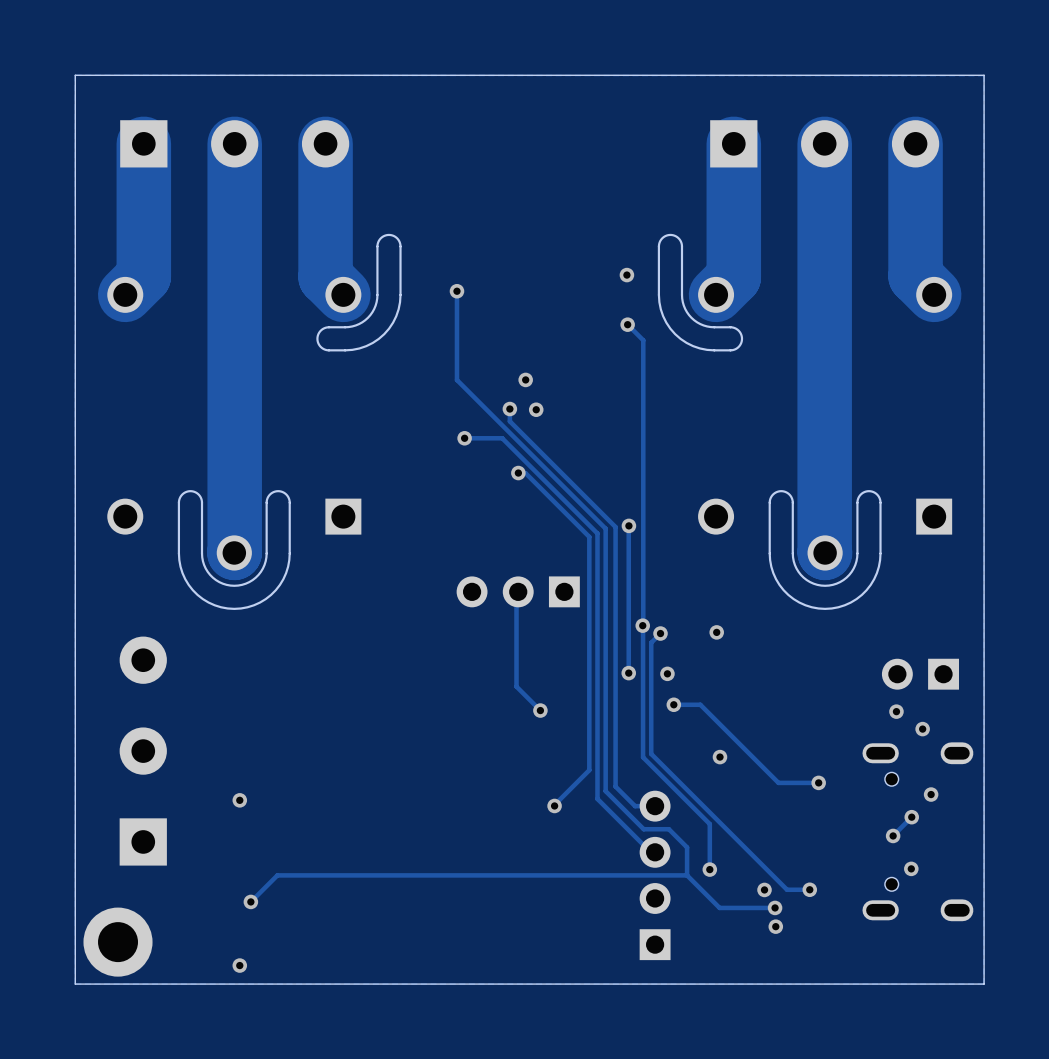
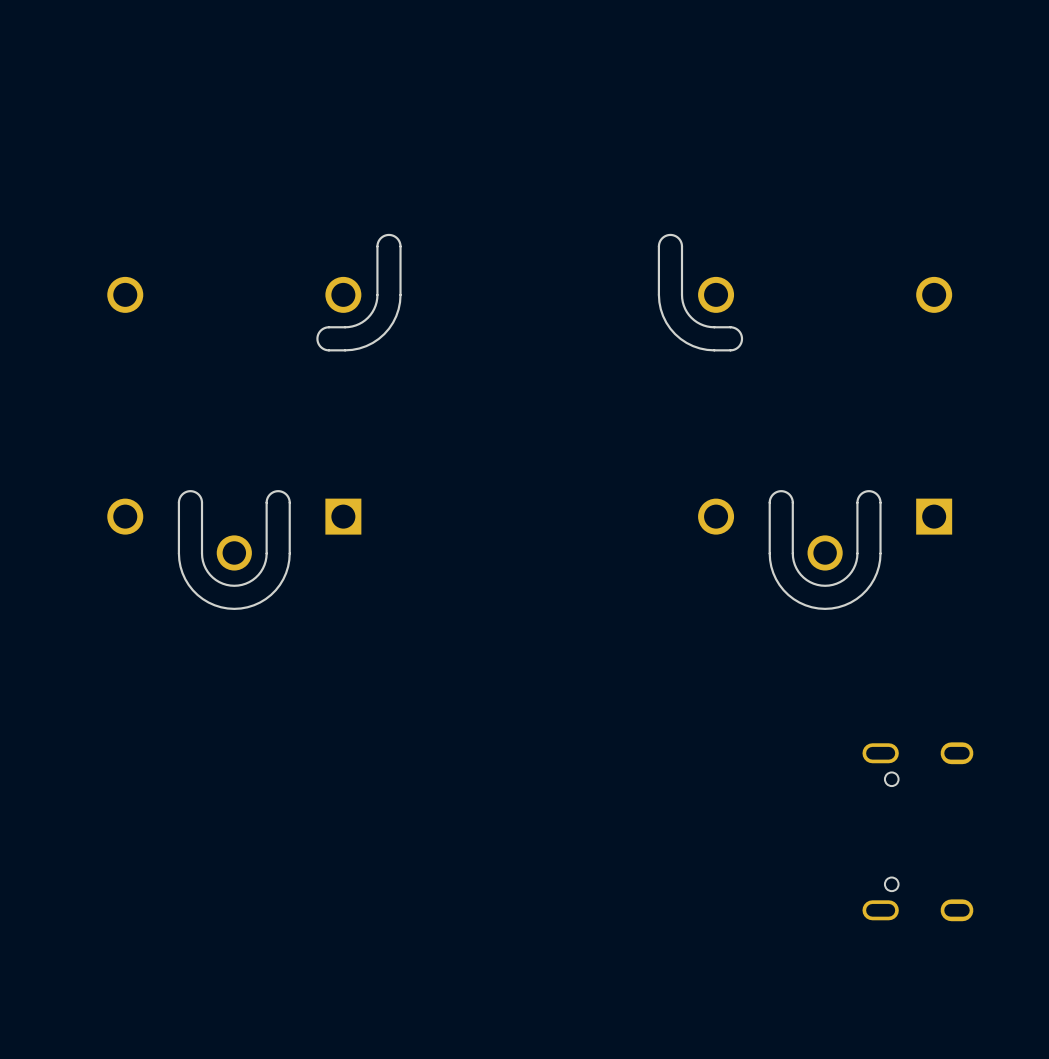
board edge: (984, 75) (984, 984) (75, 984) (75, 75) (984, 75) -> none
track: (143, 143) (143, 276) (125, 294) -> none
track: (234, 143) (234, 552) -> none
part: (234, 143) -> none
track: (325, 143) (325, 277) (343, 294) -> none
track: (733, 143) (733, 277) (716, 294) -> none
track: (824, 143) (825, 552) -> none
part: (824, 143) -> none
track: (915, 143) (915, 276) (934, 294) -> none
via: (626, 275) -> none
track: (456, 291) (456, 380) (605, 528) (605, 791) (643, 829) (668, 829) (687, 847) (687, 875) -> none
via: (456, 291) -> none
track: (627, 324) (643, 340) (643, 757) (709, 824) (709, 869) -> none
via: (627, 324) -> none
via: (525, 379) -> none
track: (509, 409) (509, 421) (615, 527) (615, 786) (635, 806) (655, 806) -> none
via: (509, 409) -> none
via: (536, 409) -> none
track: (464, 438) (502, 438) (597, 533) (597, 798) (652, 853) -> none
via: (464, 438) -> none
track: (518, 473) (525, 473) (589, 536) (589, 770) (554, 805) -> none
via: (518, 473) -> none
via: (628, 525) -> none
track: (628, 526) (628, 673) -> none
track: (518, 591) (516, 593) (516, 686) (540, 710) -> none
part: (518, 591) -> none
via: (642, 625) -> none
via: (716, 632) -> none
track: (660, 633) (651, 642) (651, 753) (787, 889) (809, 889) -> none
via: (660, 633) -> none
via: (628, 673) -> none
via: (667, 673) -> none
part: (920, 674) -> none
track: (673, 704) (700, 704) (778, 782) (818, 782) -> none
via: (673, 704) -> none
via: (540, 710) -> none
via: (896, 711) -> none
via: (922, 729) -> none
part: (143, 751) -> none
via: (719, 757) -> none
via: (818, 782) -> none
via: (931, 794) -> none
via: (239, 800) -> none
via: (554, 805) -> none
track: (911, 817) (893, 835) -> none
via: (911, 817) -> none
via: (893, 835) -> none
via: (911, 868) -> none
via: (709, 869) -> none
part: (655, 875) -> none
track: (687, 875) (719, 907) (775, 907) -> none
track: (687, 875) (277, 875) (250, 901) -> none
via: (764, 889) -> none
via: (809, 889) -> none
via: (250, 901) -> none
via: (775, 907) -> none
via: (775, 926) -> none
part: (118, 942) -> none
via: (239, 965) -> none

